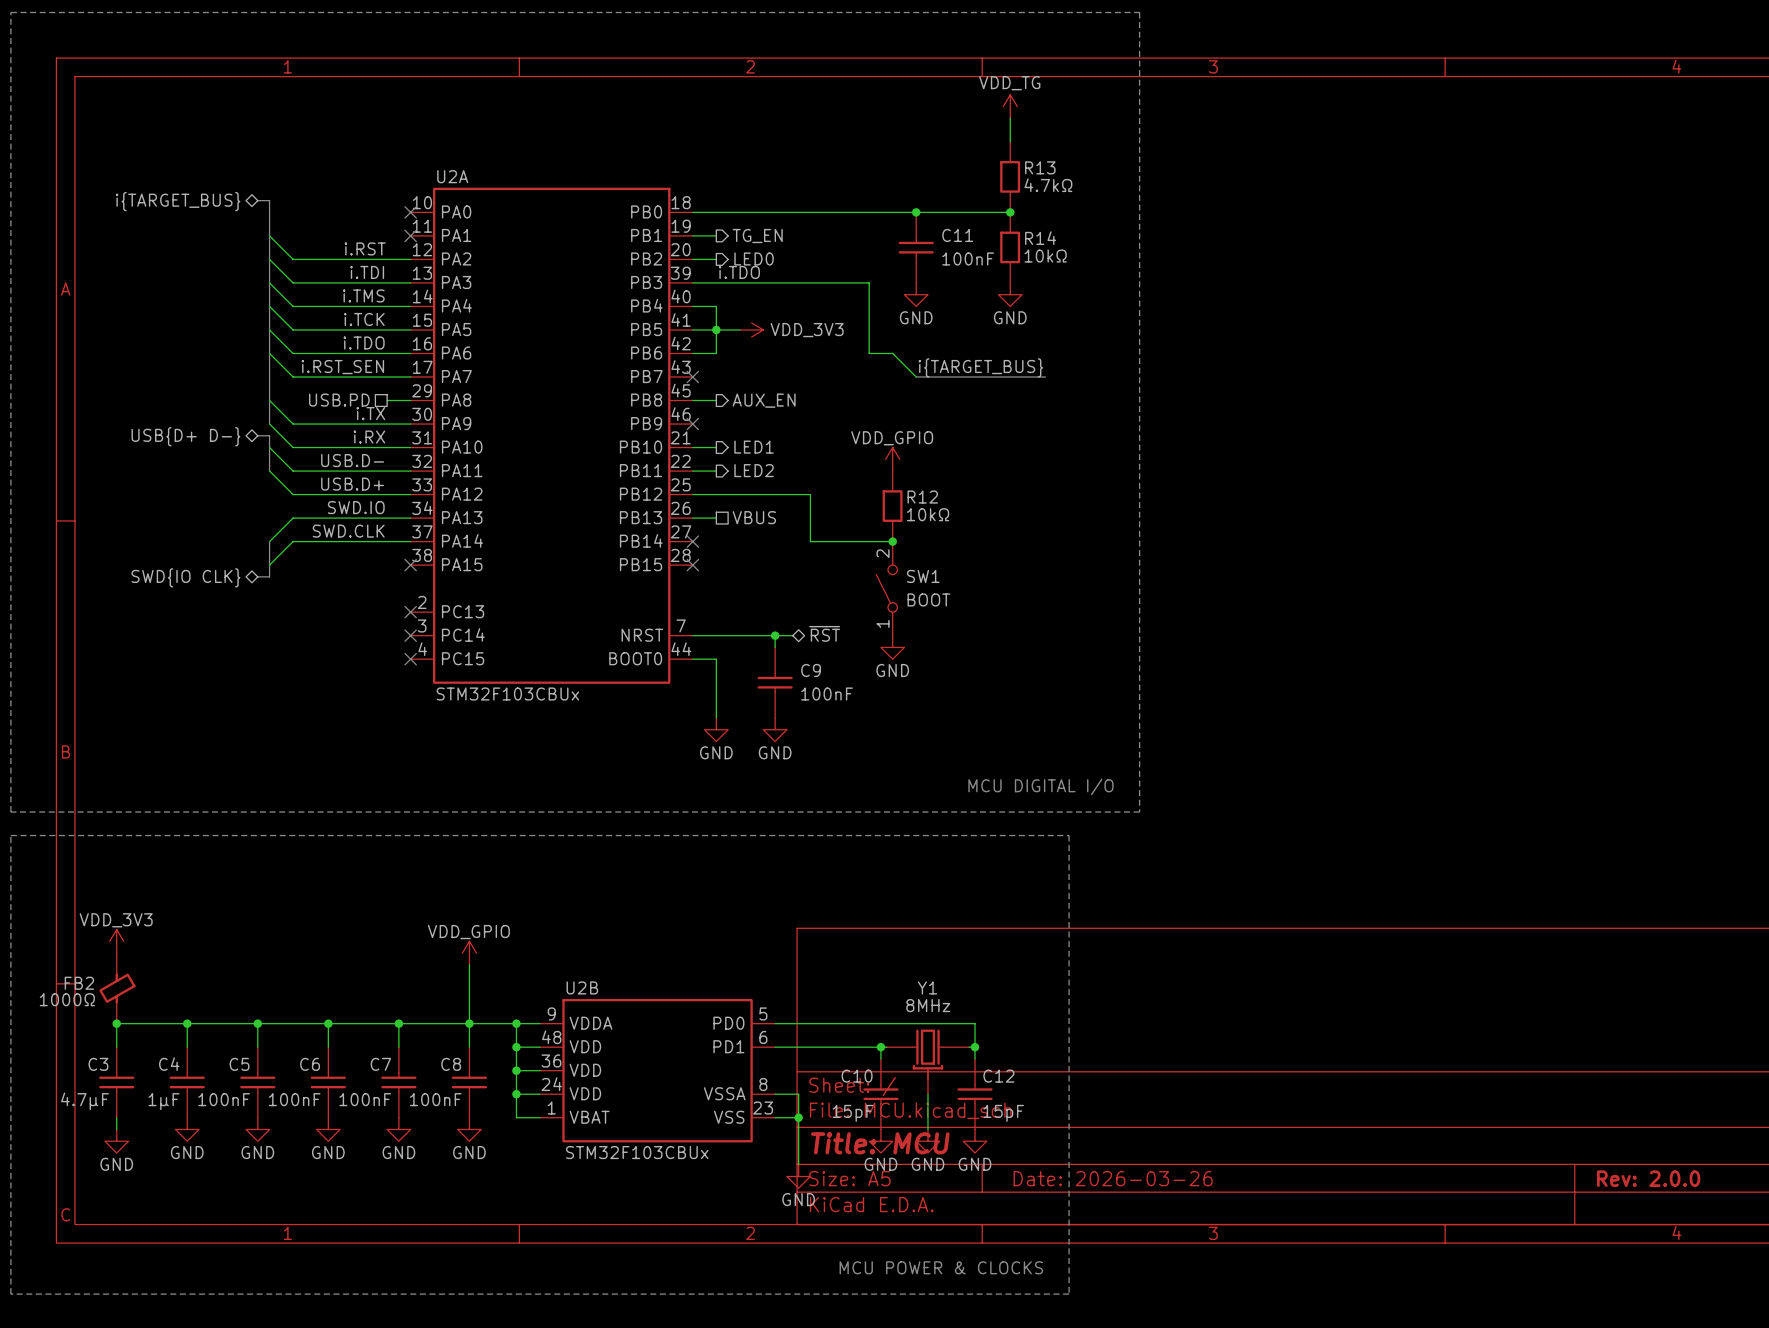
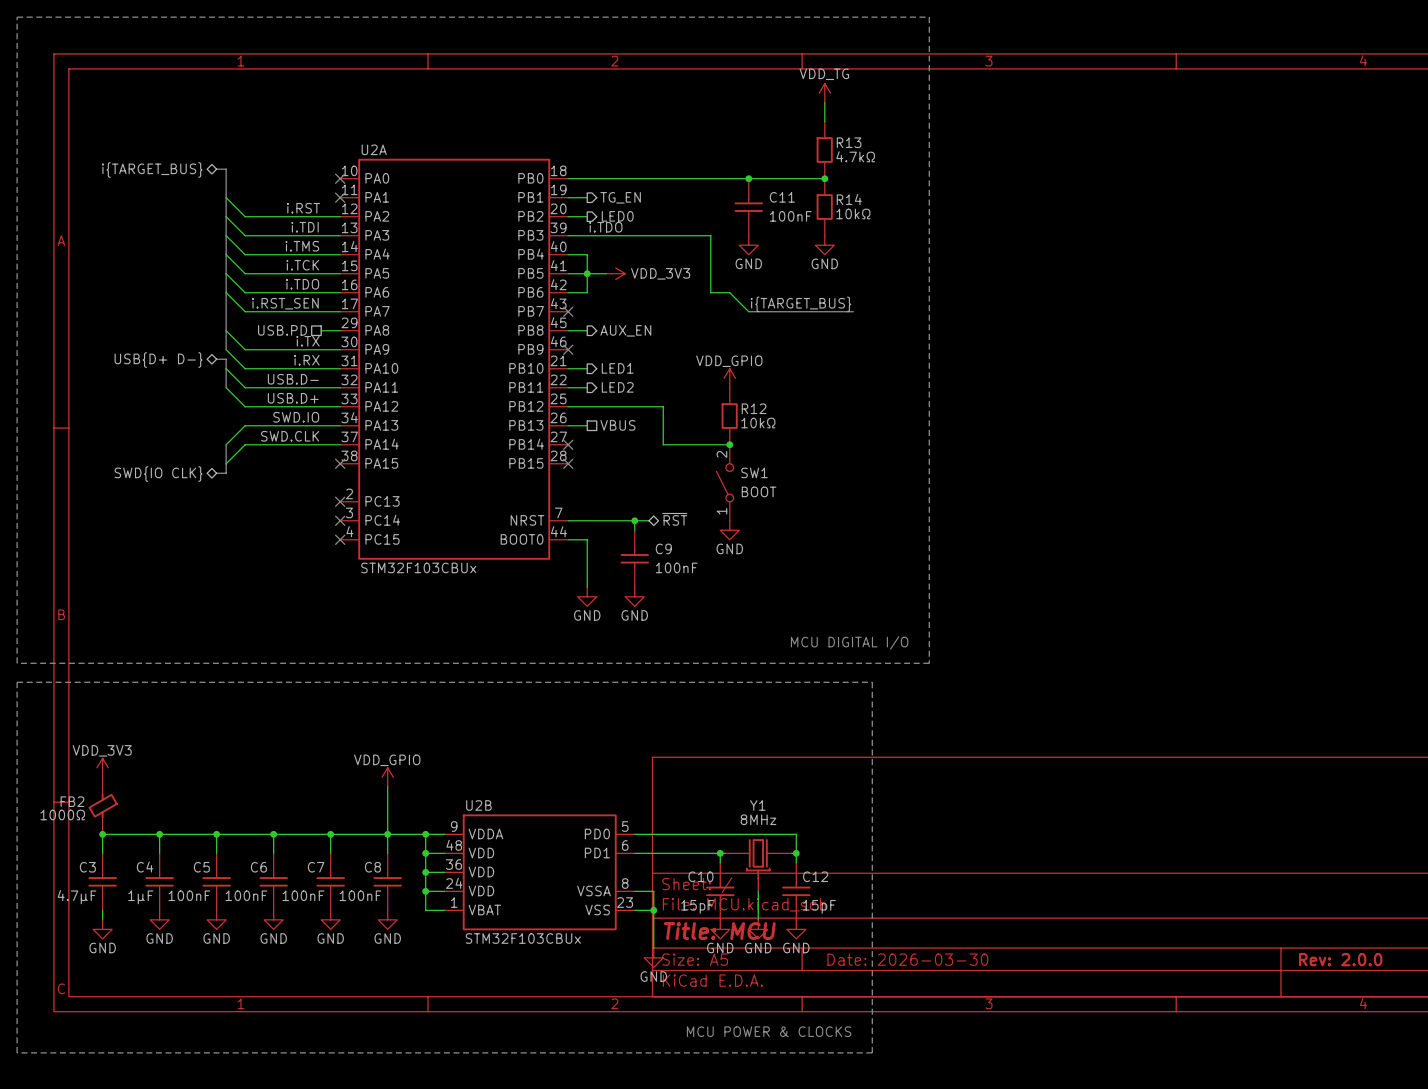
title block: Date: 2026-03-26 (1113, 1178) -> Date: 2026-03-30 (907, 959)

